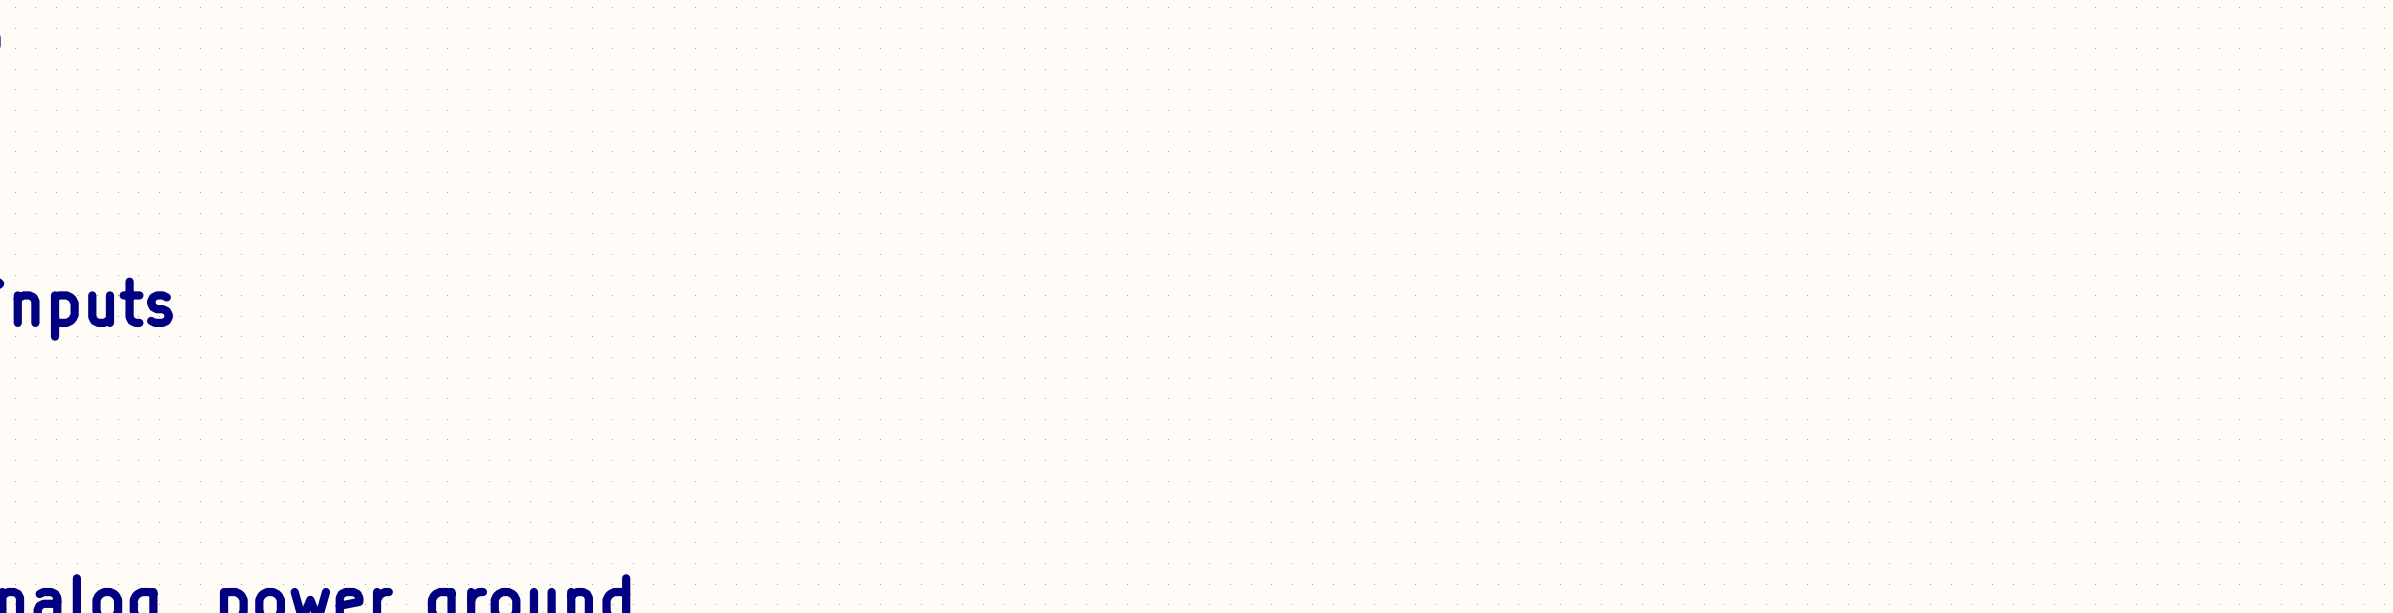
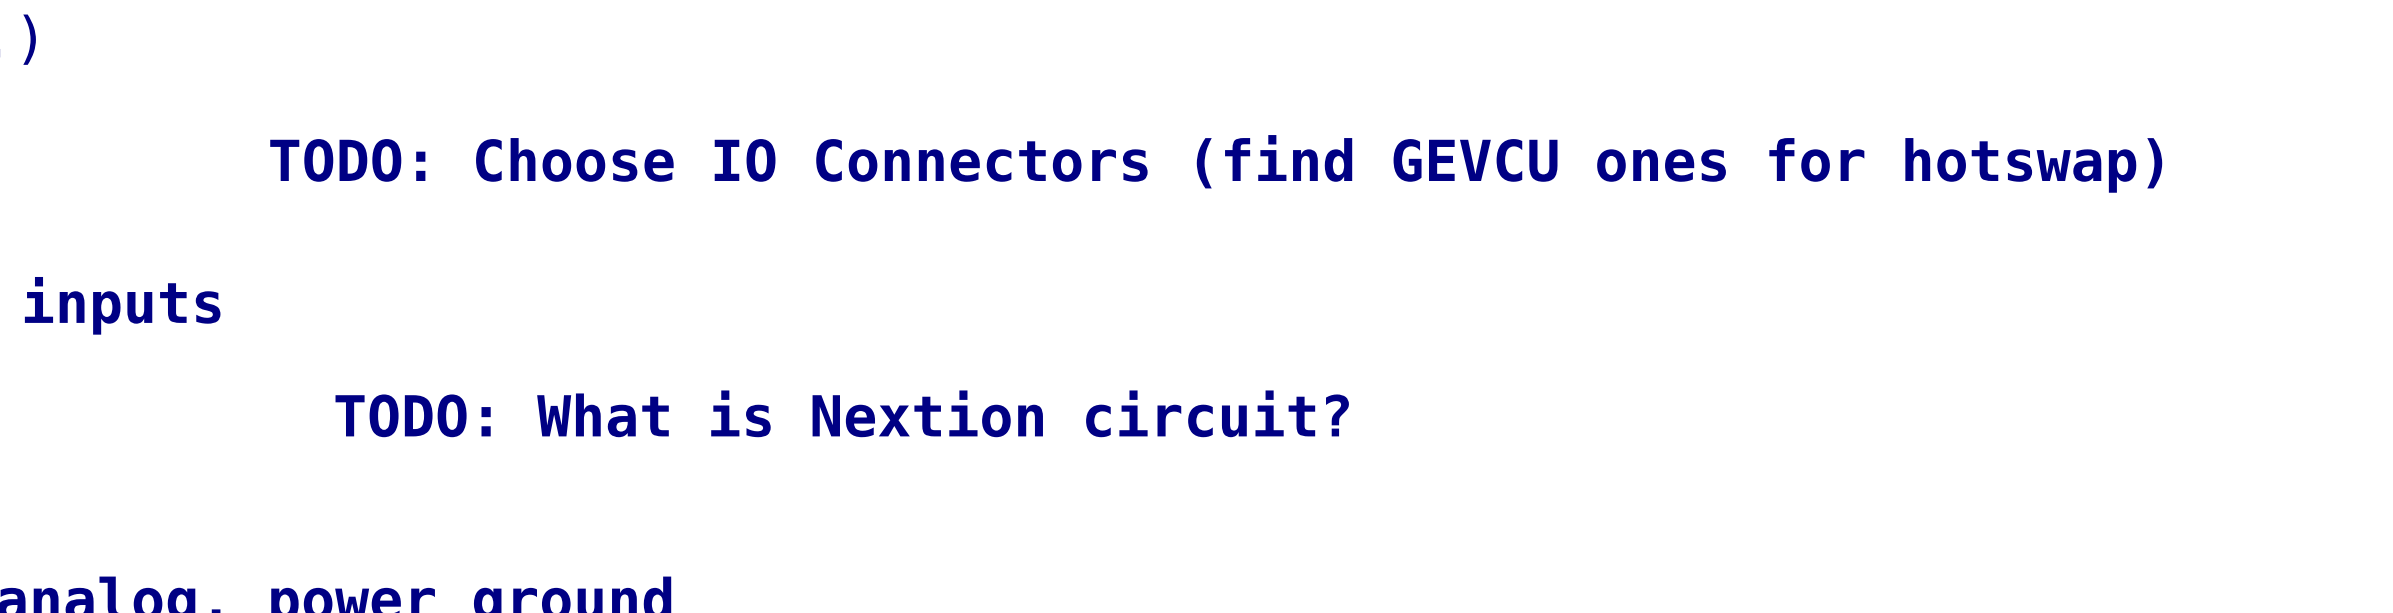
text: none -> TODO: Choose IO Connectors (find GEVCU ones for hotswap) (1216, 163)
text: none -> TODO: What is Nextion circuit? (842, 413)

